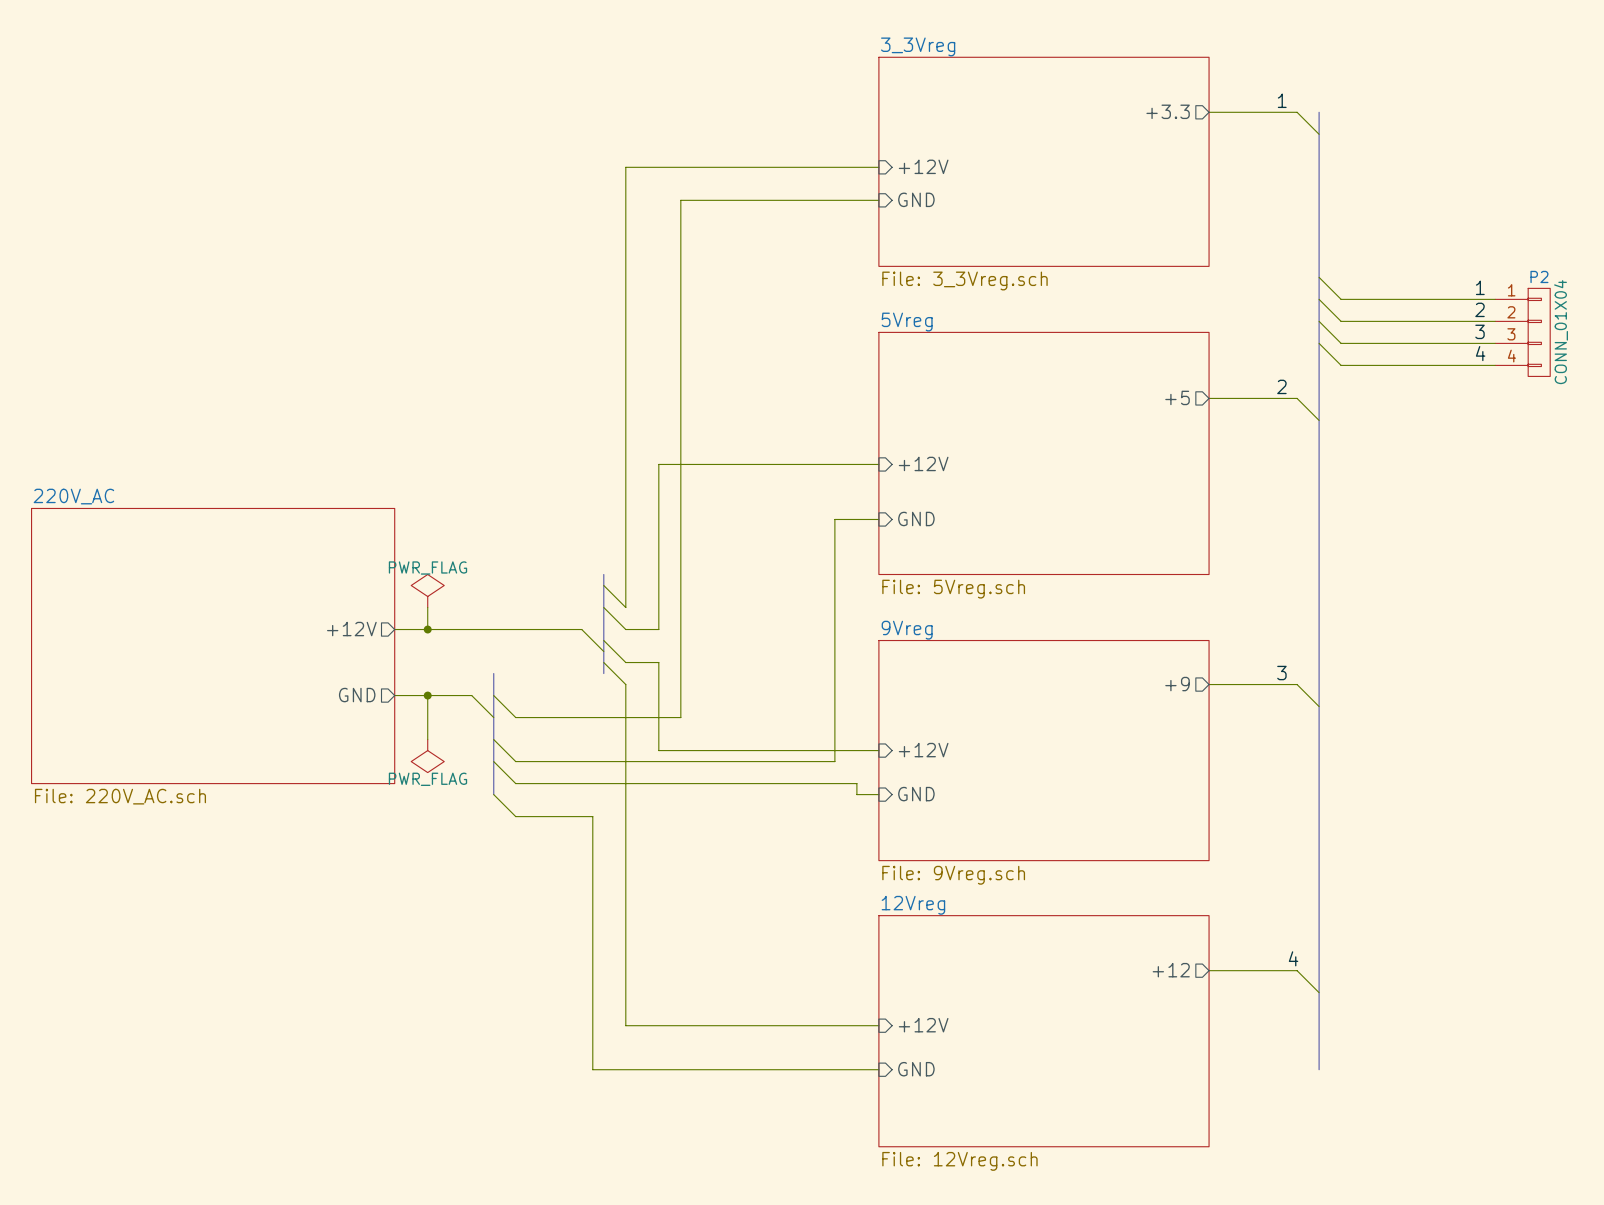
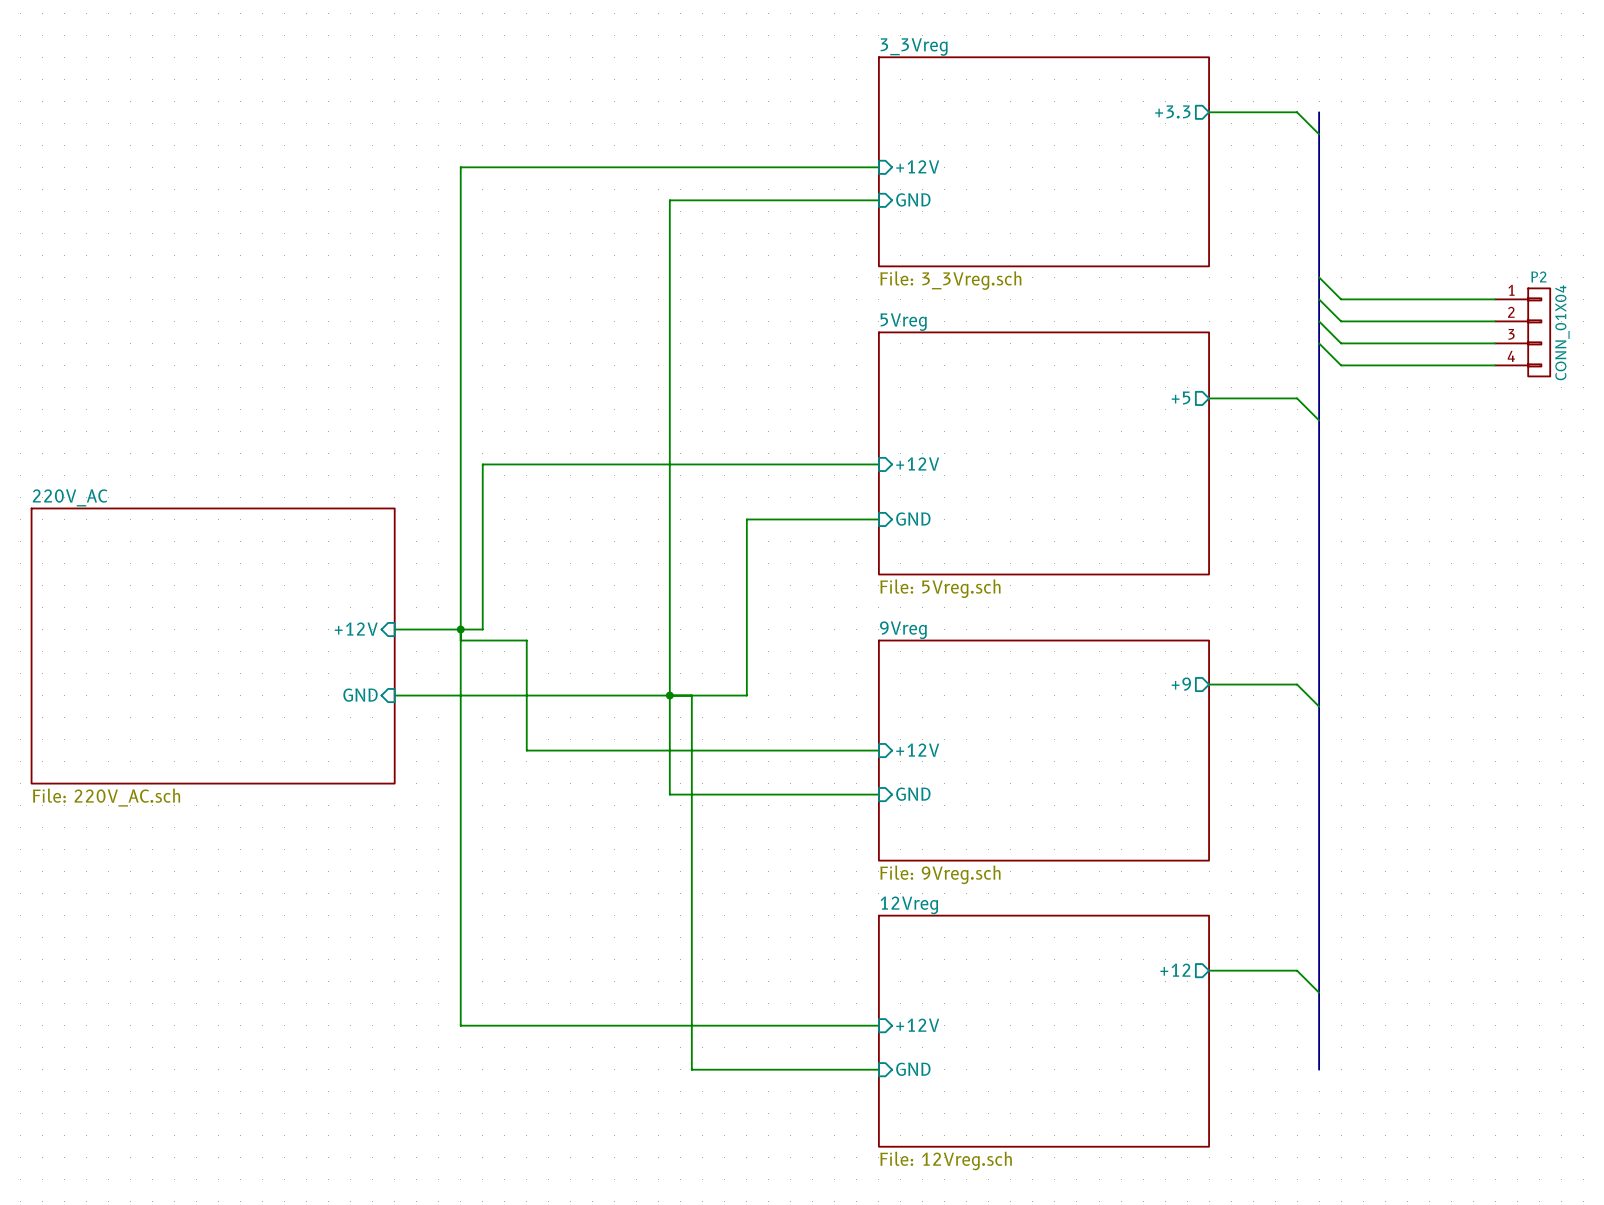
label: 1 (1282, 100) -> none
wire: (625, 167) (625, 607) (603, 585) -> (625, 167) (460, 167) (460, 1025) (625, 1025)
wire: (680, 200) (680, 717) (515, 717) (493, 695) -> (680, 200) (669, 200) (669, 794) (856, 794)
label: 1 (1480, 287) -> none
label: 2 (1480, 309) -> none
label: 3 (1480, 331) -> none
label: 4 (1480, 353) -> none
label: 2 (1281, 386) -> none
wire: (658, 464) (658, 629) (625, 629) (603, 607) -> (658, 464) (482, 464) (482, 629)
wire: (834, 519) (834, 761) (515, 761) (493, 739) -> (834, 519) (746, 519) (746, 695) (471, 695)
bus: (603, 574) (603, 673) -> none
power symbol: PWR_FLAG (427, 591) -> none
wire: (427, 607) (427, 629) -> none
sheet pin shape: output (351, 629) -> input (356, 629)
junction position: (427, 629) -> (460, 629)
wire: (482, 629) (581, 629) (603, 651) -> none
wire: (603, 640) (625, 662) (658, 662) (658, 750) -> (460, 640) (526, 640) (526, 750) (658, 750)
wire: (603, 662) (625, 684) (625, 1025) -> none
bus: (493, 673) (493, 794) -> none
label: 3 (1281, 673) -> none
sheet pin shape: output (357, 695) -> input (360, 695)
wire: (427, 695) (427, 739) -> none
junction: (427, 695) -> none
wire: (471, 695) (493, 717) -> none
junction: none -> (669, 695)
power symbol: PWR_FLAG (427, 756) -> none
wire: (493, 761) (515, 783) (856, 783) (856, 794) -> none
wire: (493, 794) (515, 816) (592, 816) (592, 1069) (691, 1069) -> (691, 695) (691, 1069)
label: 4 (1293, 958) -> none

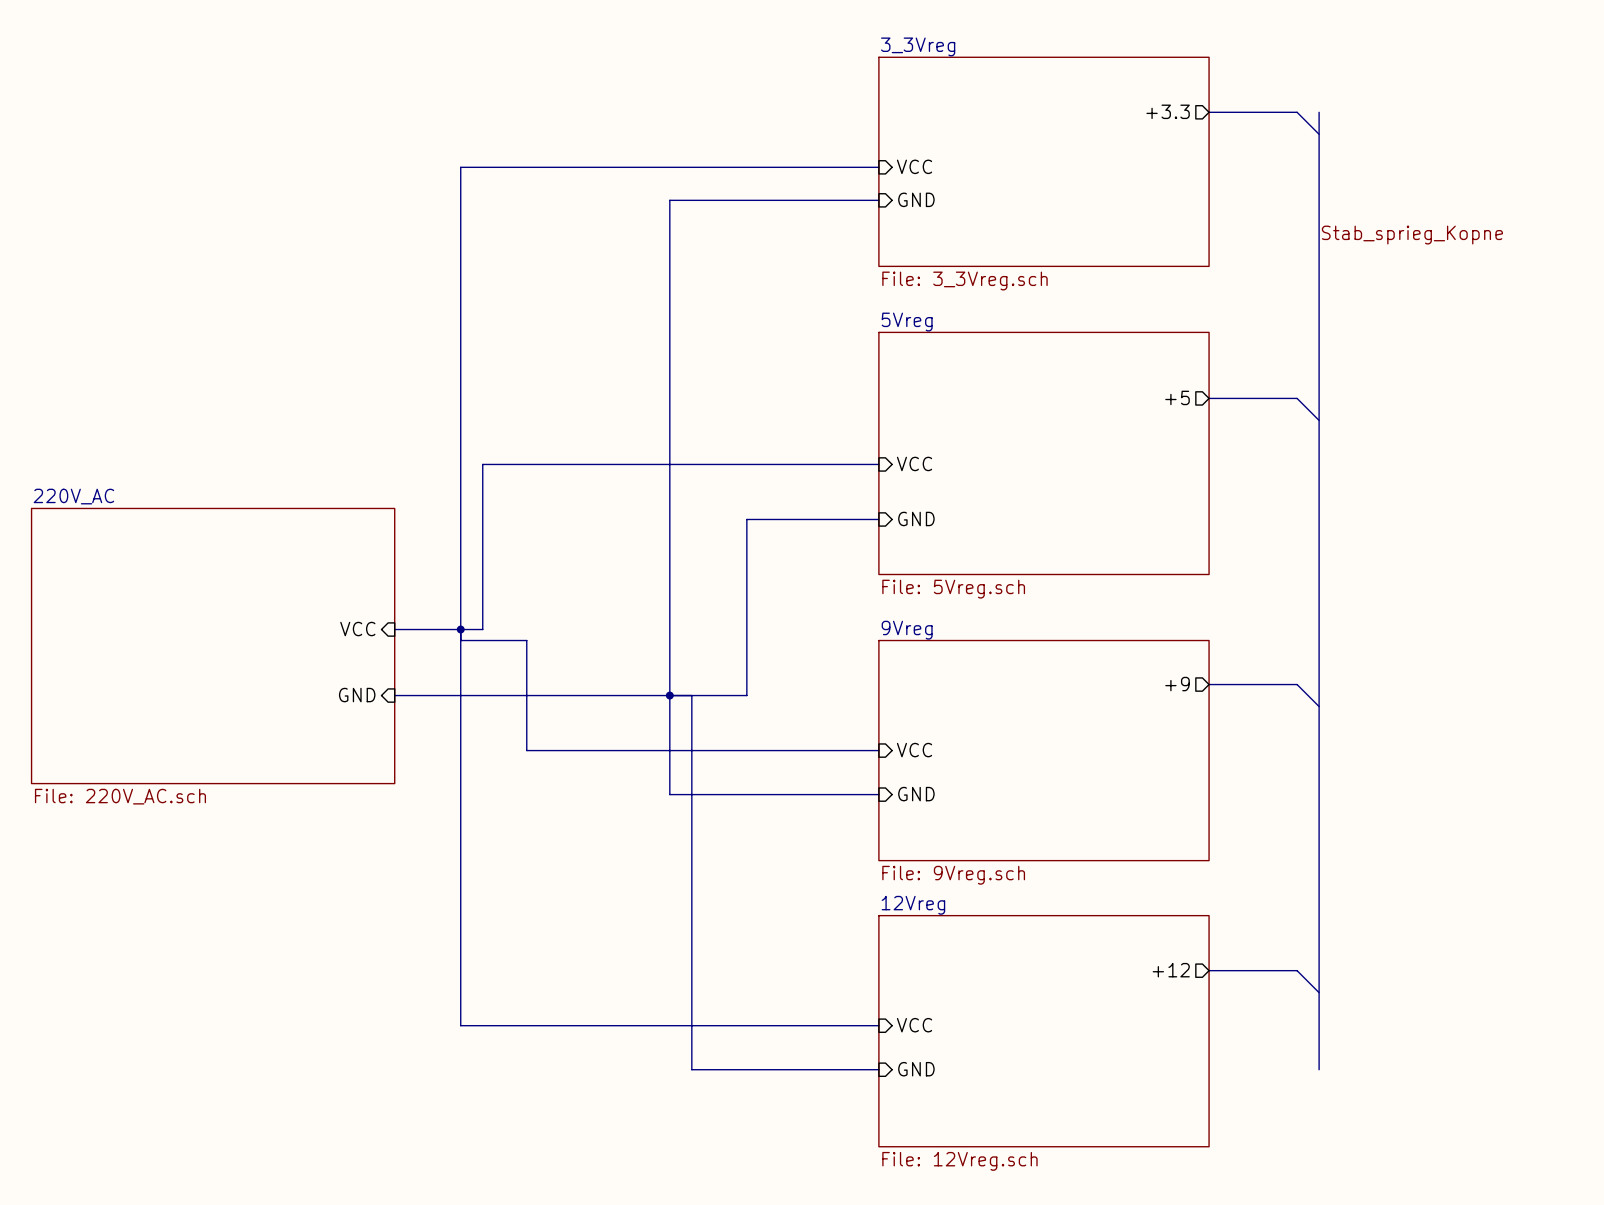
sheet pin: +12V (917, 166) -> VCC (914, 166)
label: none -> Stab_sprieg_Kopne (1412, 235)
wire: (1319, 277) (1341, 299) (1495, 299) -> none
wire: (1319, 299) (1341, 321) (1495, 321) -> none
wire: (1319, 321) (1341, 343) (1495, 343) -> none
P2: CONN_01X04 (1522, 332) -> none
wire: (1319, 343) (1341, 365) (1495, 365) -> none
sheet pin: +12V (917, 464) -> VCC (914, 463)
sheet pin: +12V (356, 629) -> VCC (357, 629)
sheet pin: +12V (917, 750) -> VCC (914, 750)
sheet pin: +12V (917, 1025) -> VCC (914, 1025)

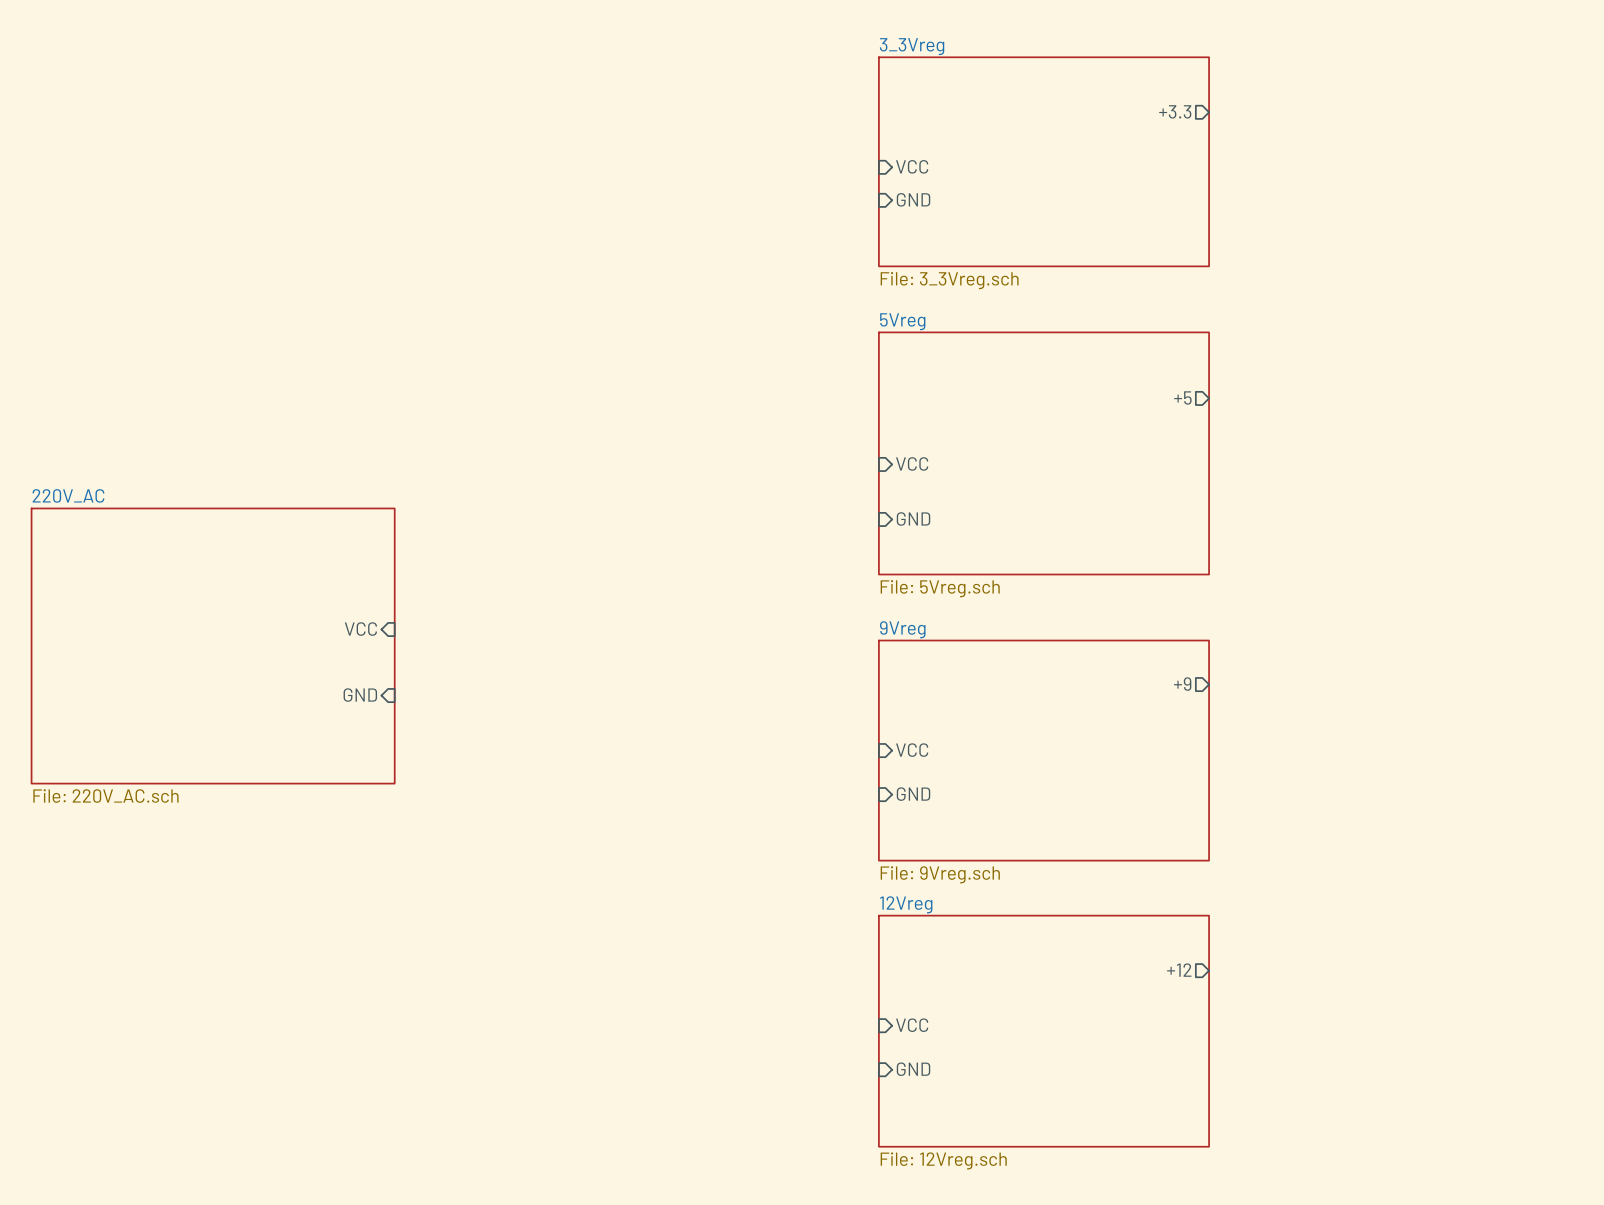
wire: (1209, 112) (1297, 112) (1319, 134) -> none
bus: (1319, 112) (1319, 1069) -> none
wire: (878, 167) (460, 167) (460, 1025) (878, 1025) -> none
wire: (878, 200) (669, 200) (669, 794) (878, 794) -> none
label: Stab_sprieg_Kopne (1412, 235) -> none
wire: (1209, 398) (1297, 398) (1319, 420) -> none
wire: (878, 464) (482, 464) (482, 629) (394, 629) -> none
wire: (878, 519) (746, 519) (746, 695) (394, 695) -> none
junction: (460, 629) -> none
wire: (460, 640) (526, 640) (526, 750) (878, 750) -> none
wire: (1209, 684) (1297, 684) (1319, 706) -> none
junction: (669, 695) -> none
wire: (691, 695) (691, 1069) (878, 1069) -> none
wire: (1209, 970) (1297, 970) (1319, 992) -> none

